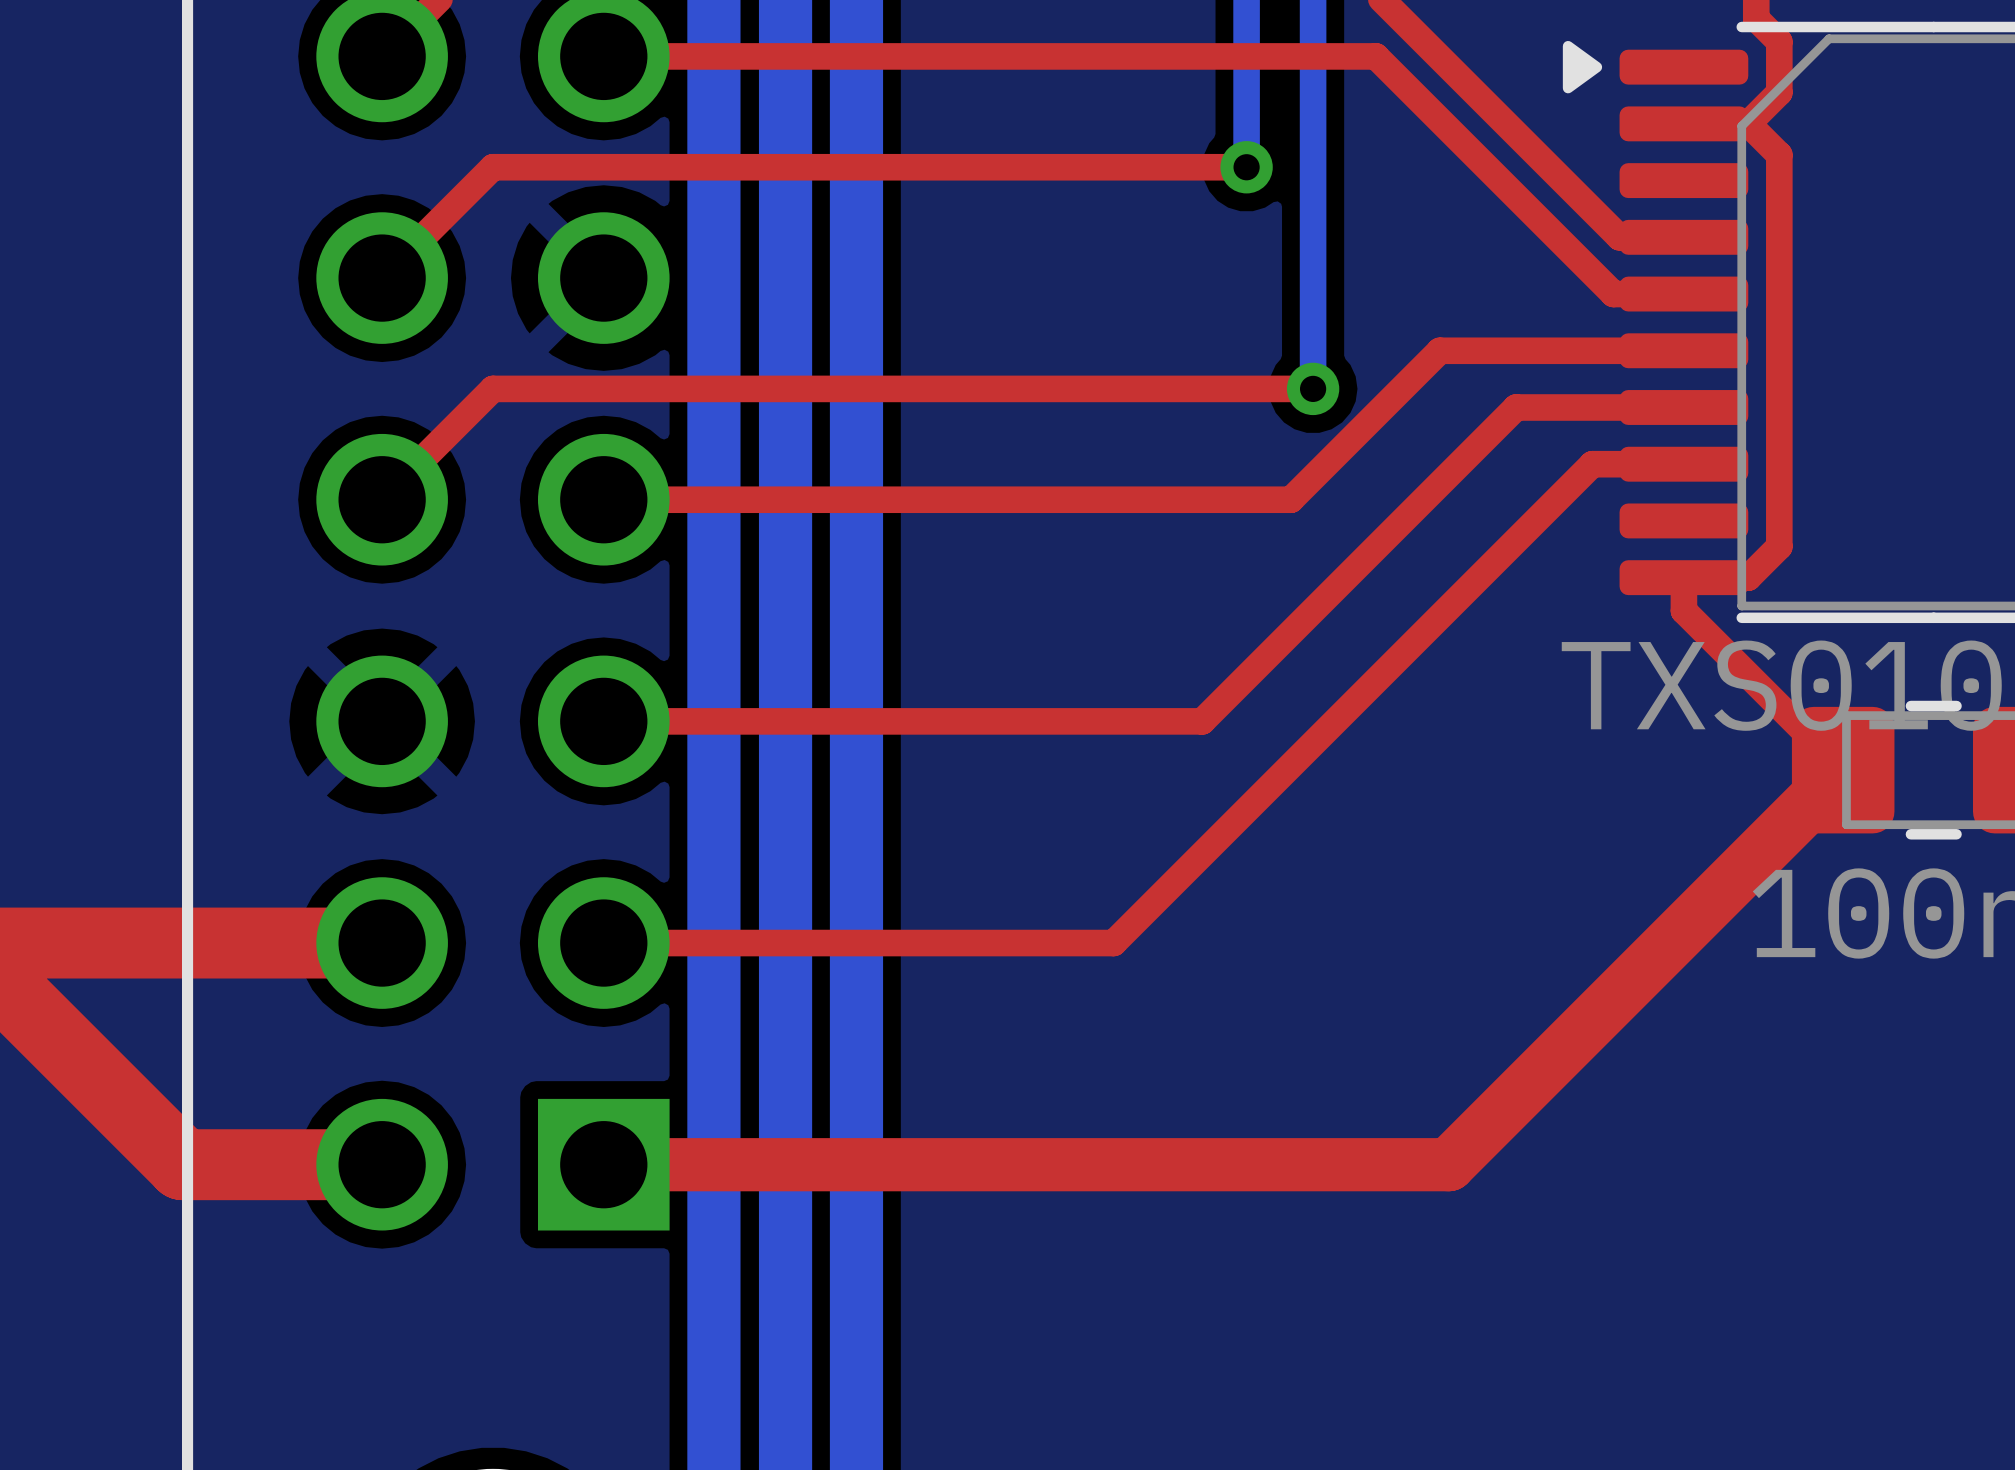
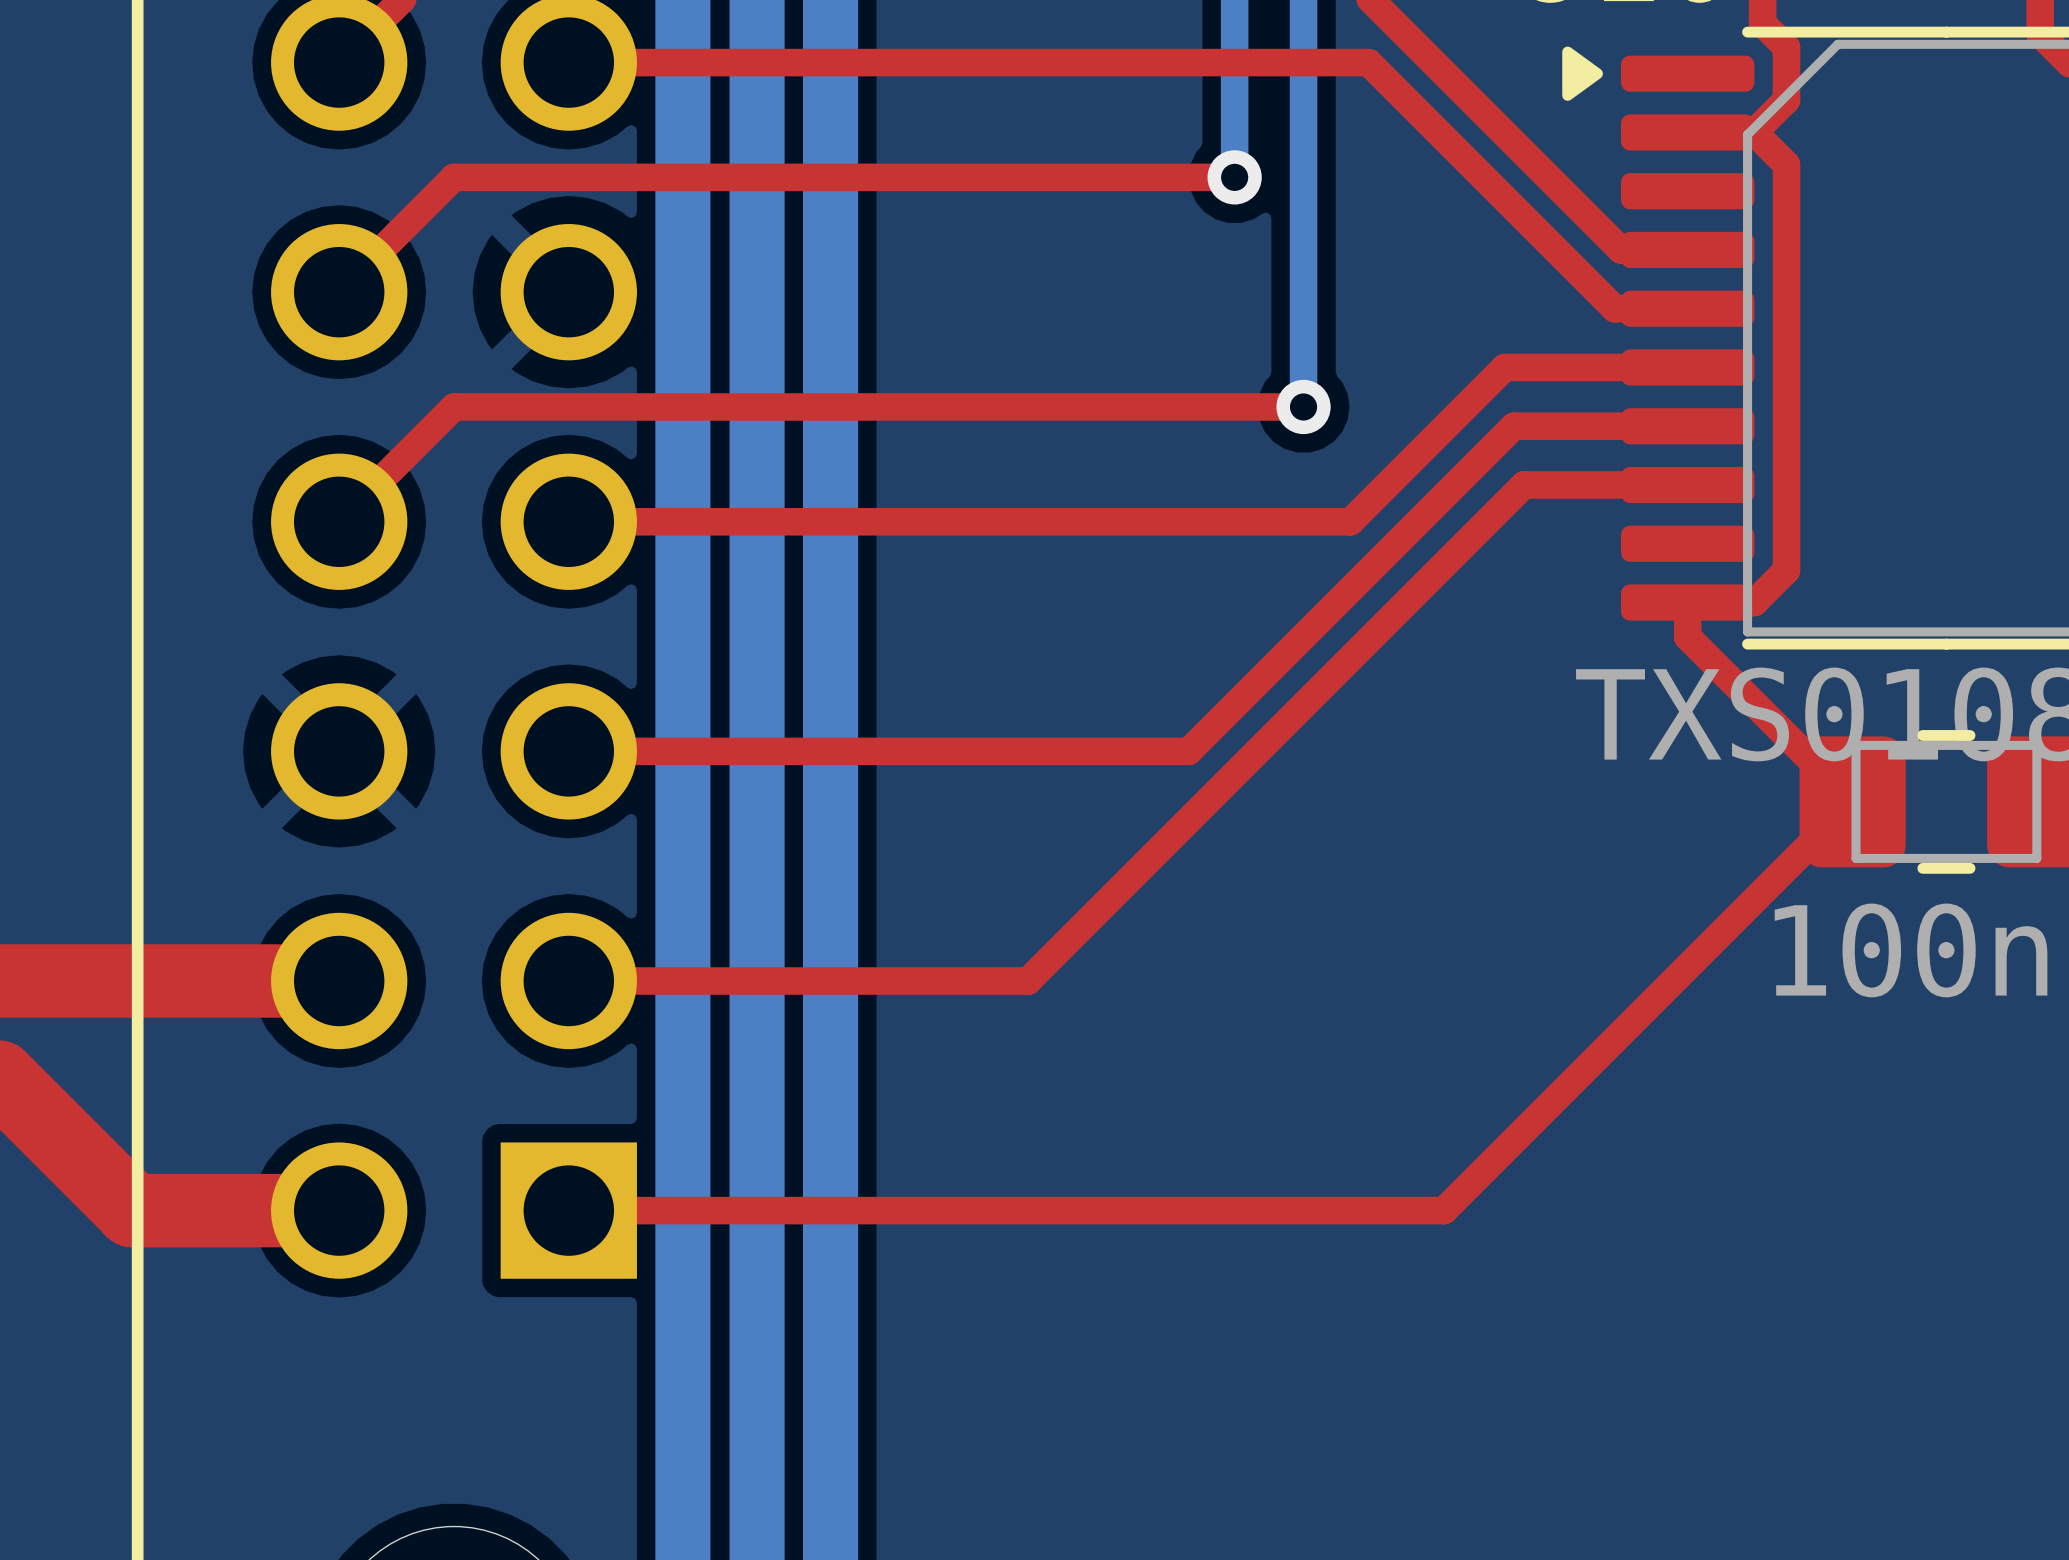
top track: (1507, 350) (1439, 350) (1290, 499) -> (1504, 367) (1350, 521) (1280, 521)
top track: (1592, 464) (1113, 943) (1047, 943) -> (1592, 484) (1524, 484) (1028, 980)
top track width: thick (1843, 770) (1448, 1164) (603, 1164) -> thin (1852, 801) (1443, 1210) (568, 1210)

